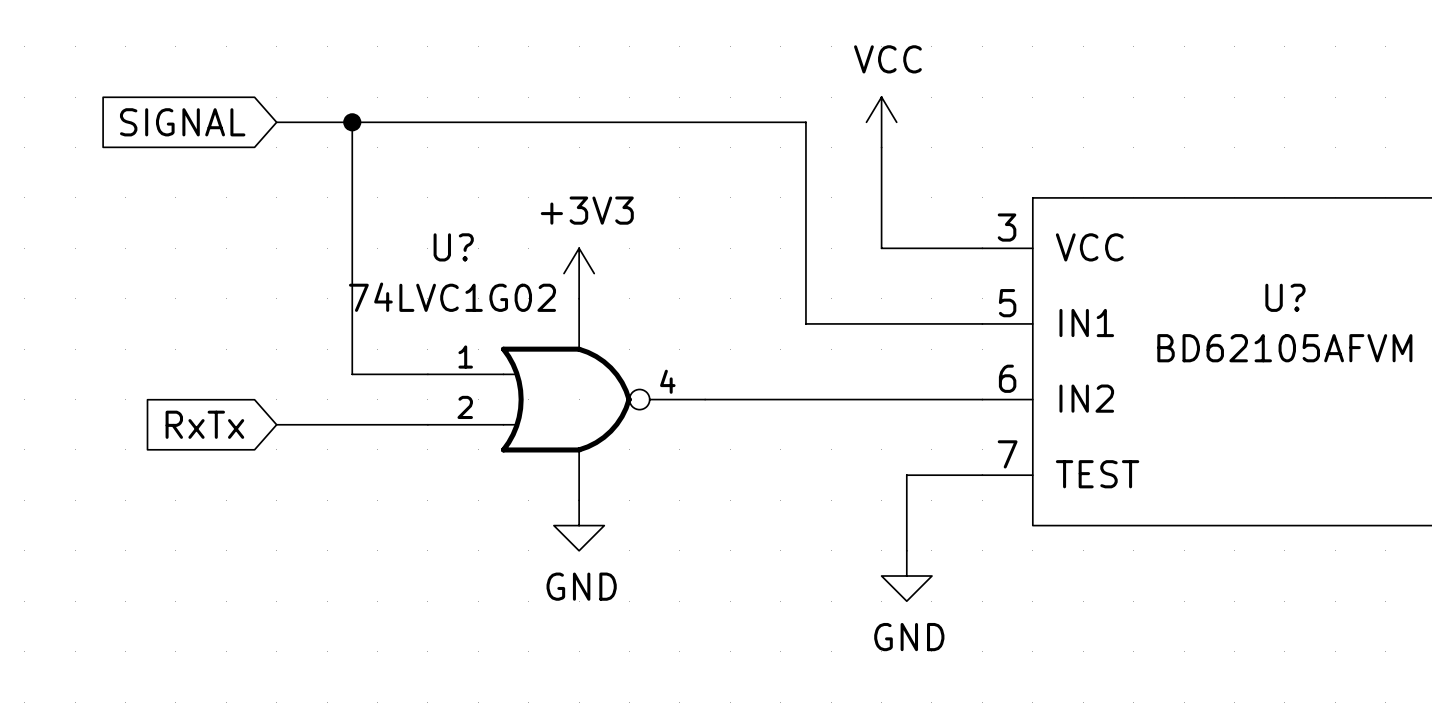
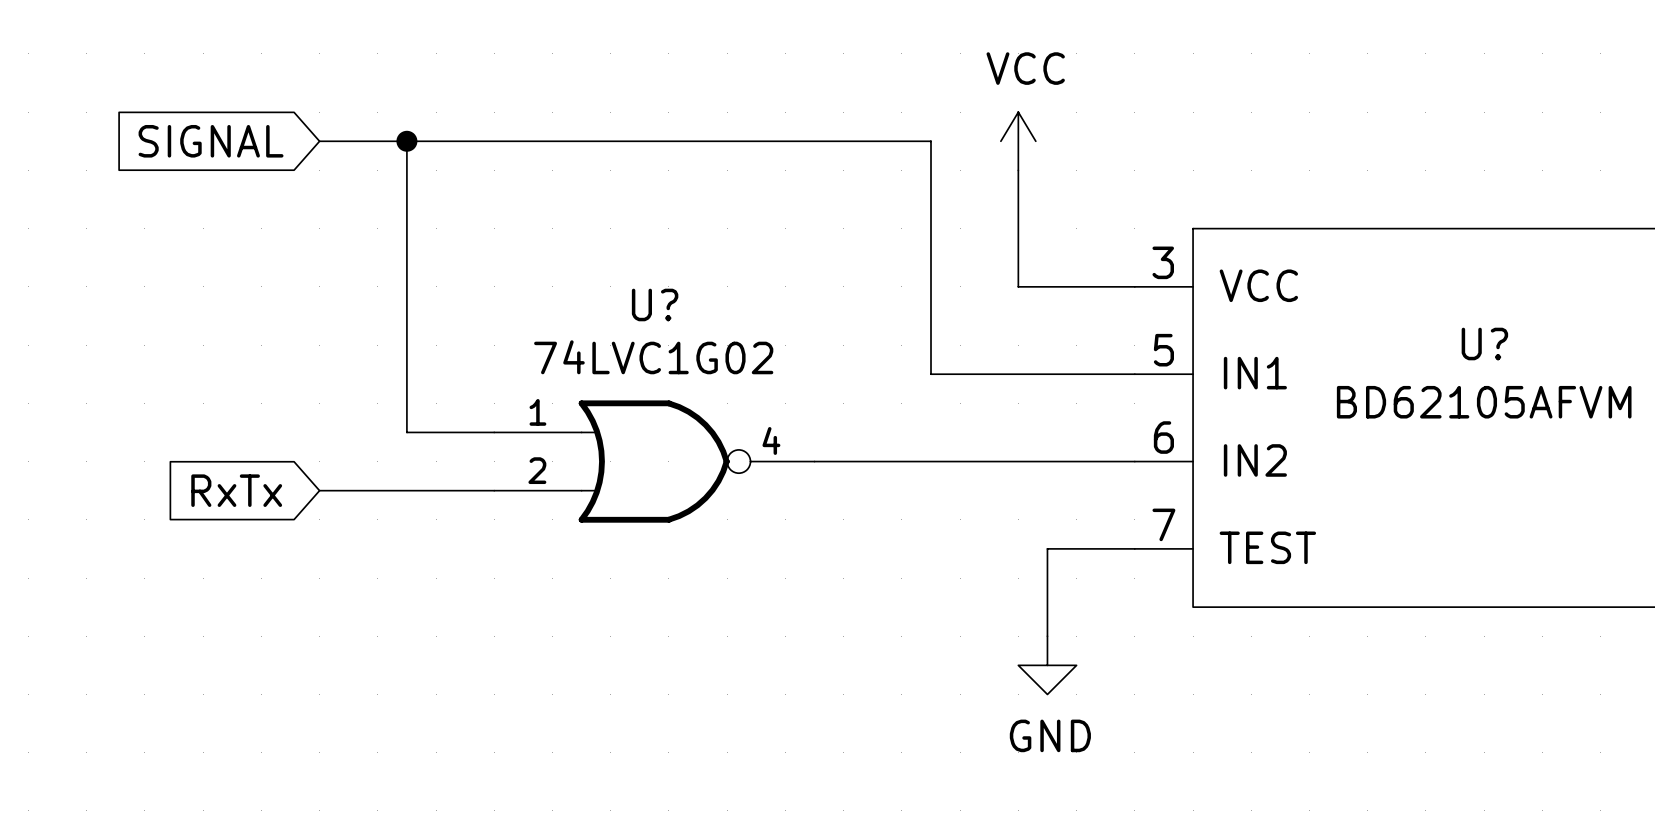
U? name position: U? (453, 247) -> U? (655, 304)
power symbol: +3V3 (579, 273) -> none
U? value position: 74LVC1G02 (452, 297) -> 74LVC1G02 (653, 357)
wire: (579, 298) (579, 349) -> none
wire: (579, 449) (579, 500) -> none
power symbol: GND (579, 525) -> none

